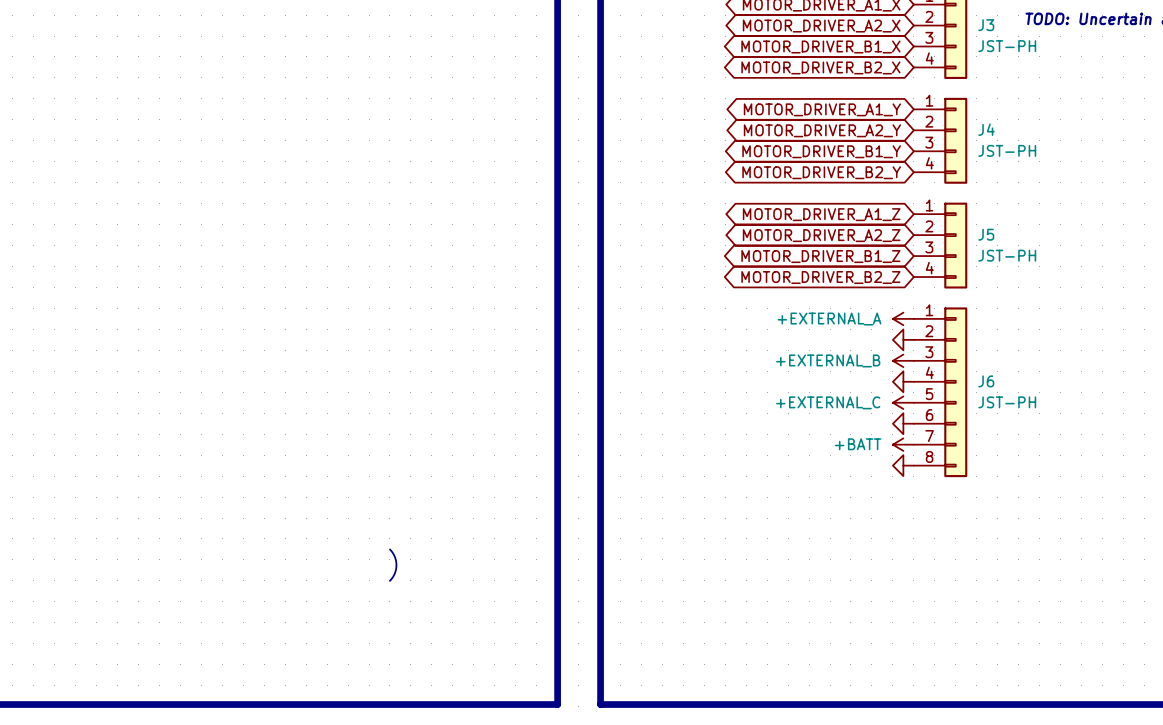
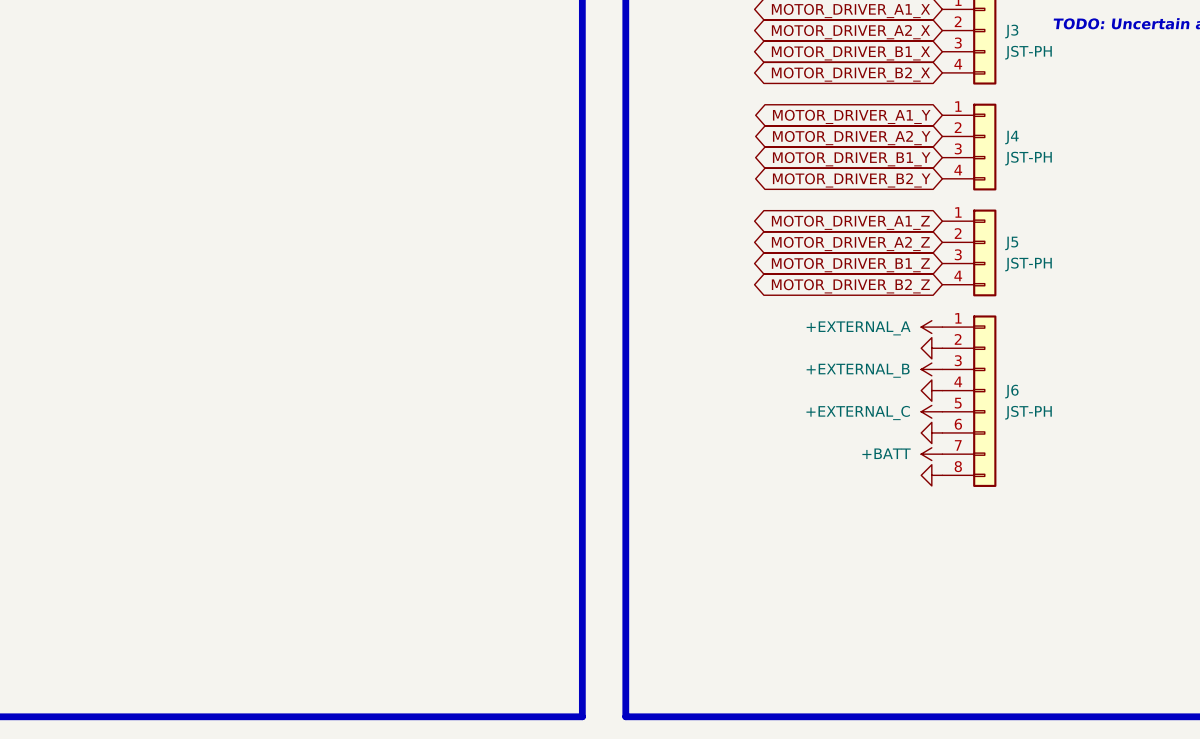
line: (389, 549) (394, 555) (396, 565) (394, 574) (389, 580) -> none

